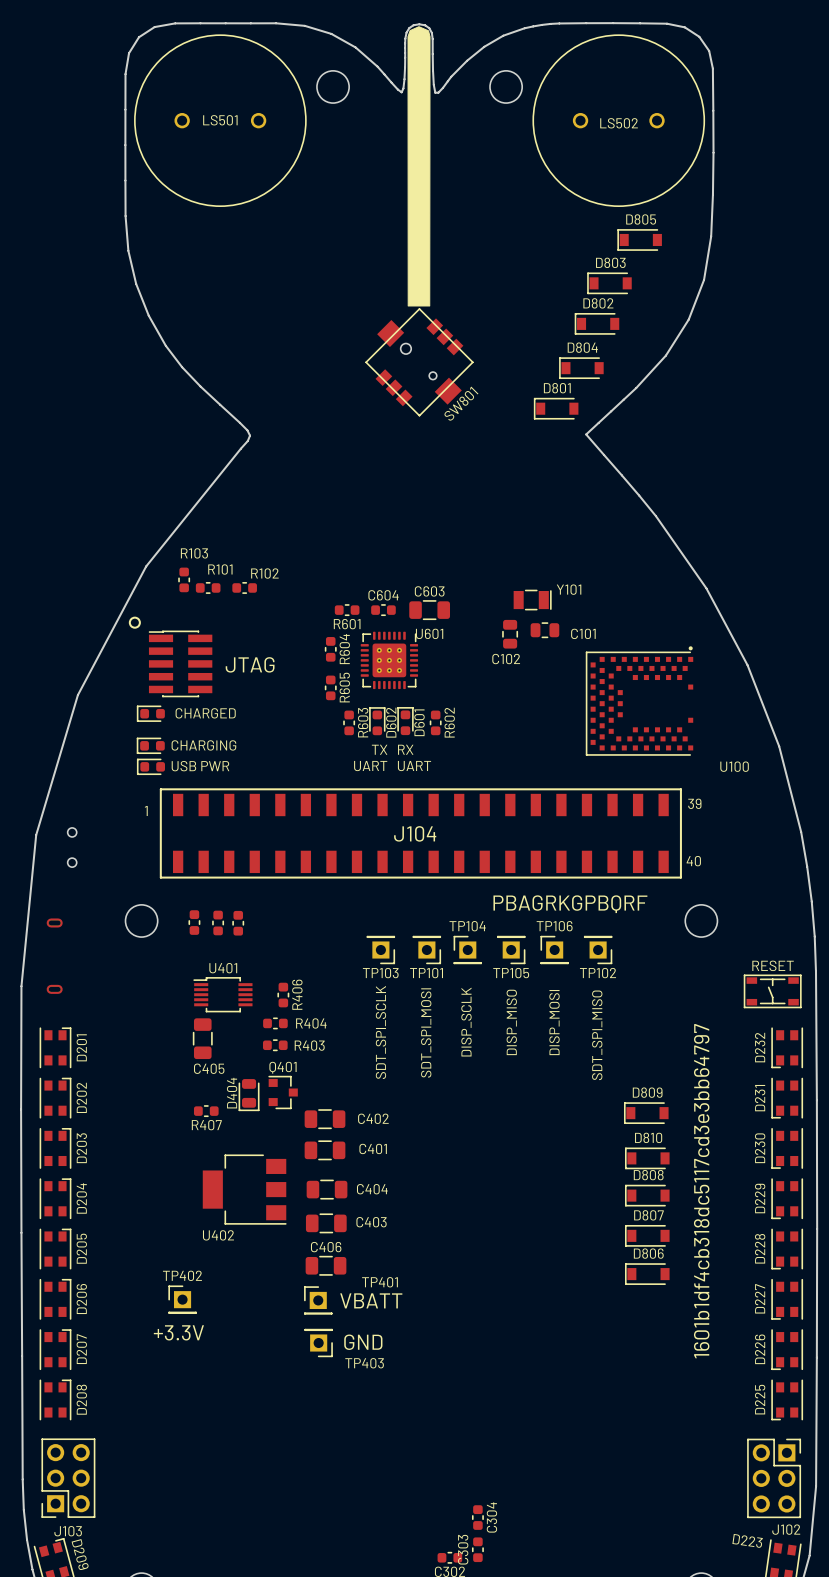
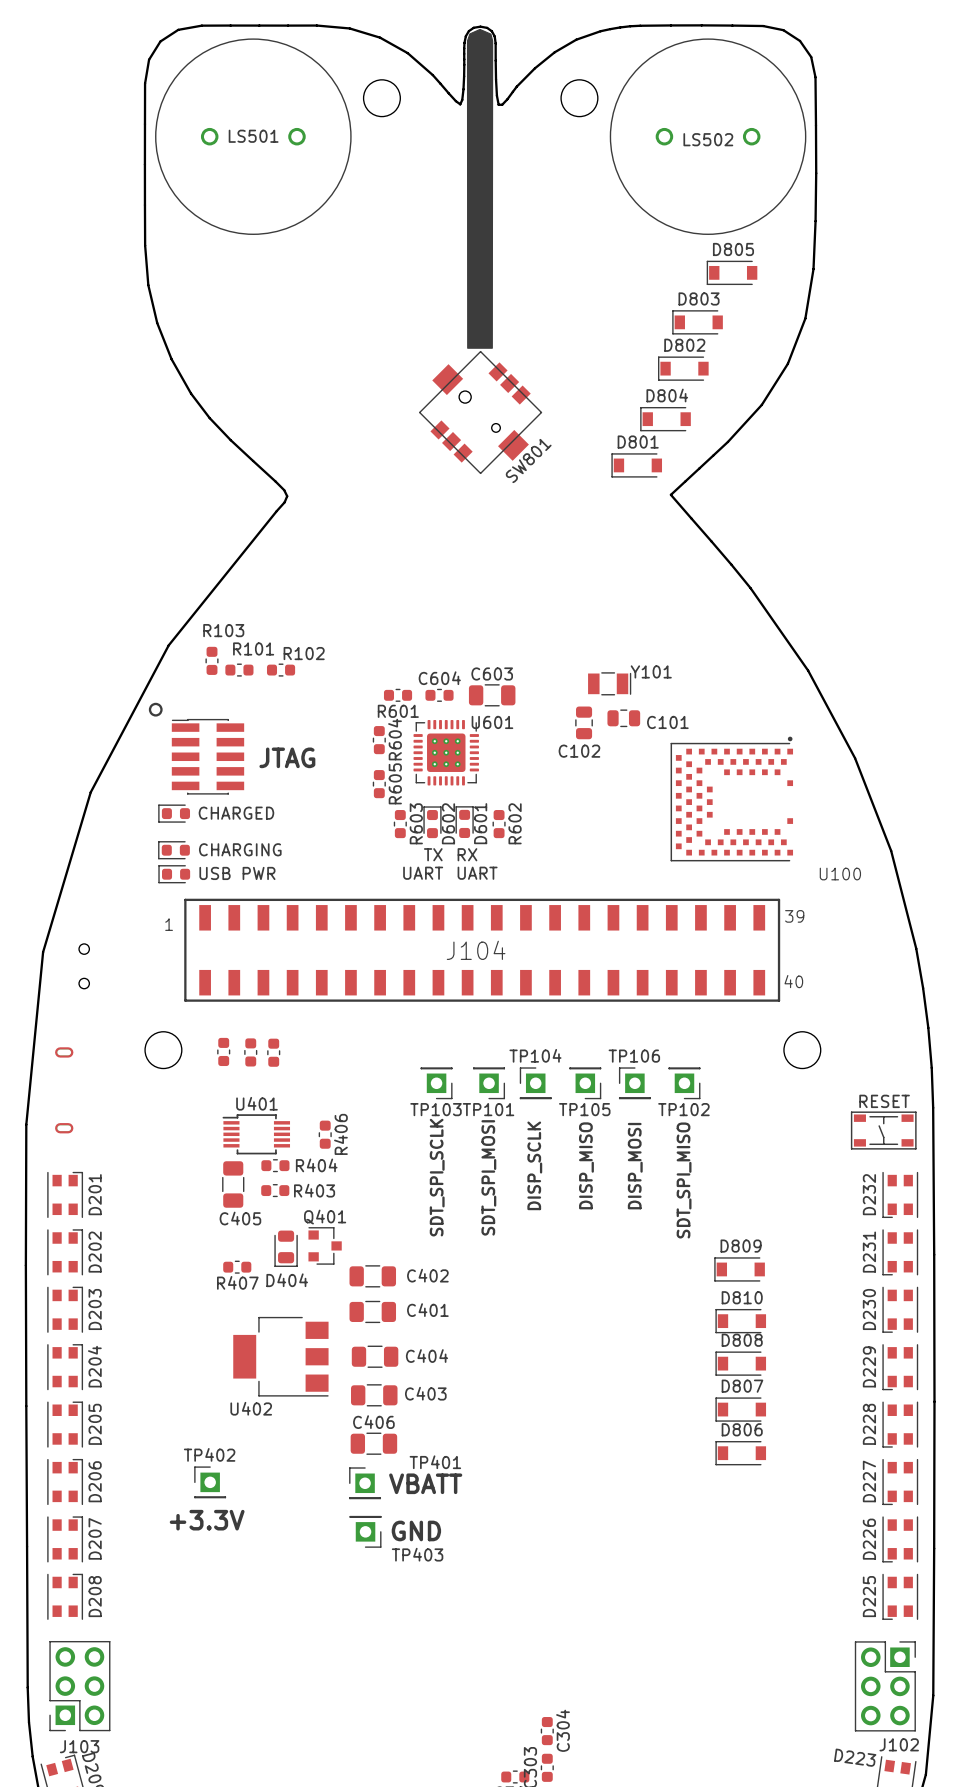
text: PBAGRKGPBQRF (570, 904) -> none
R404 position: (275, 1023) -> (275, 1165)
R403 position: (275, 1045) -> (275, 1190)
D404 name rotation: 0° (232, 1093) -> 90° clockwise (287, 1280)
text: 1601b1df4cb318dc5117cd3e3bb64797 (701, 1191) -> none

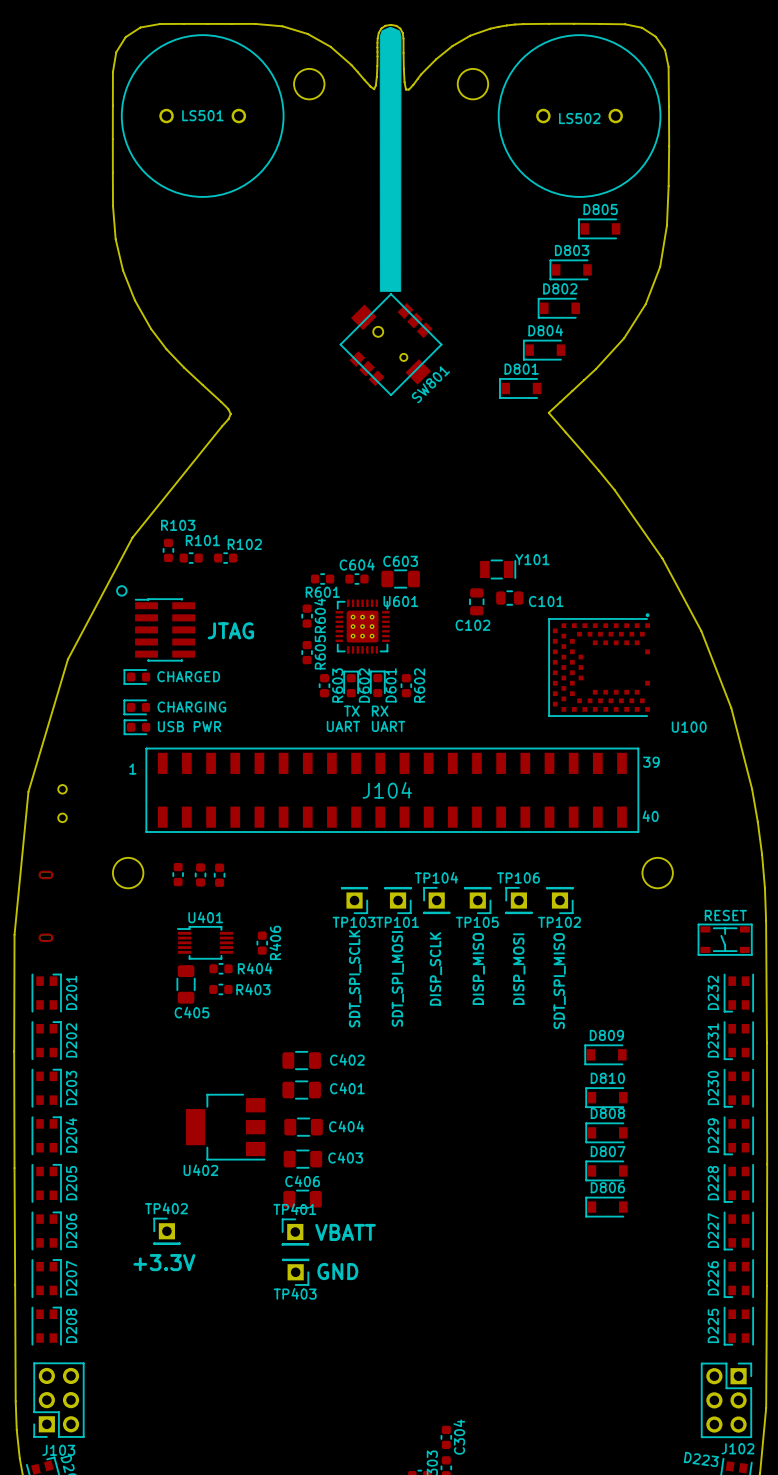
Q401: (325, 1245) -> none
D404: (286, 1248) -> none
R407: (237, 1267) -> none
TP401 name position: TP401 (435, 1462) -> TP401 (294, 1209)
TP403 name position: TP403 (417, 1554) -> TP403 (295, 1293)

